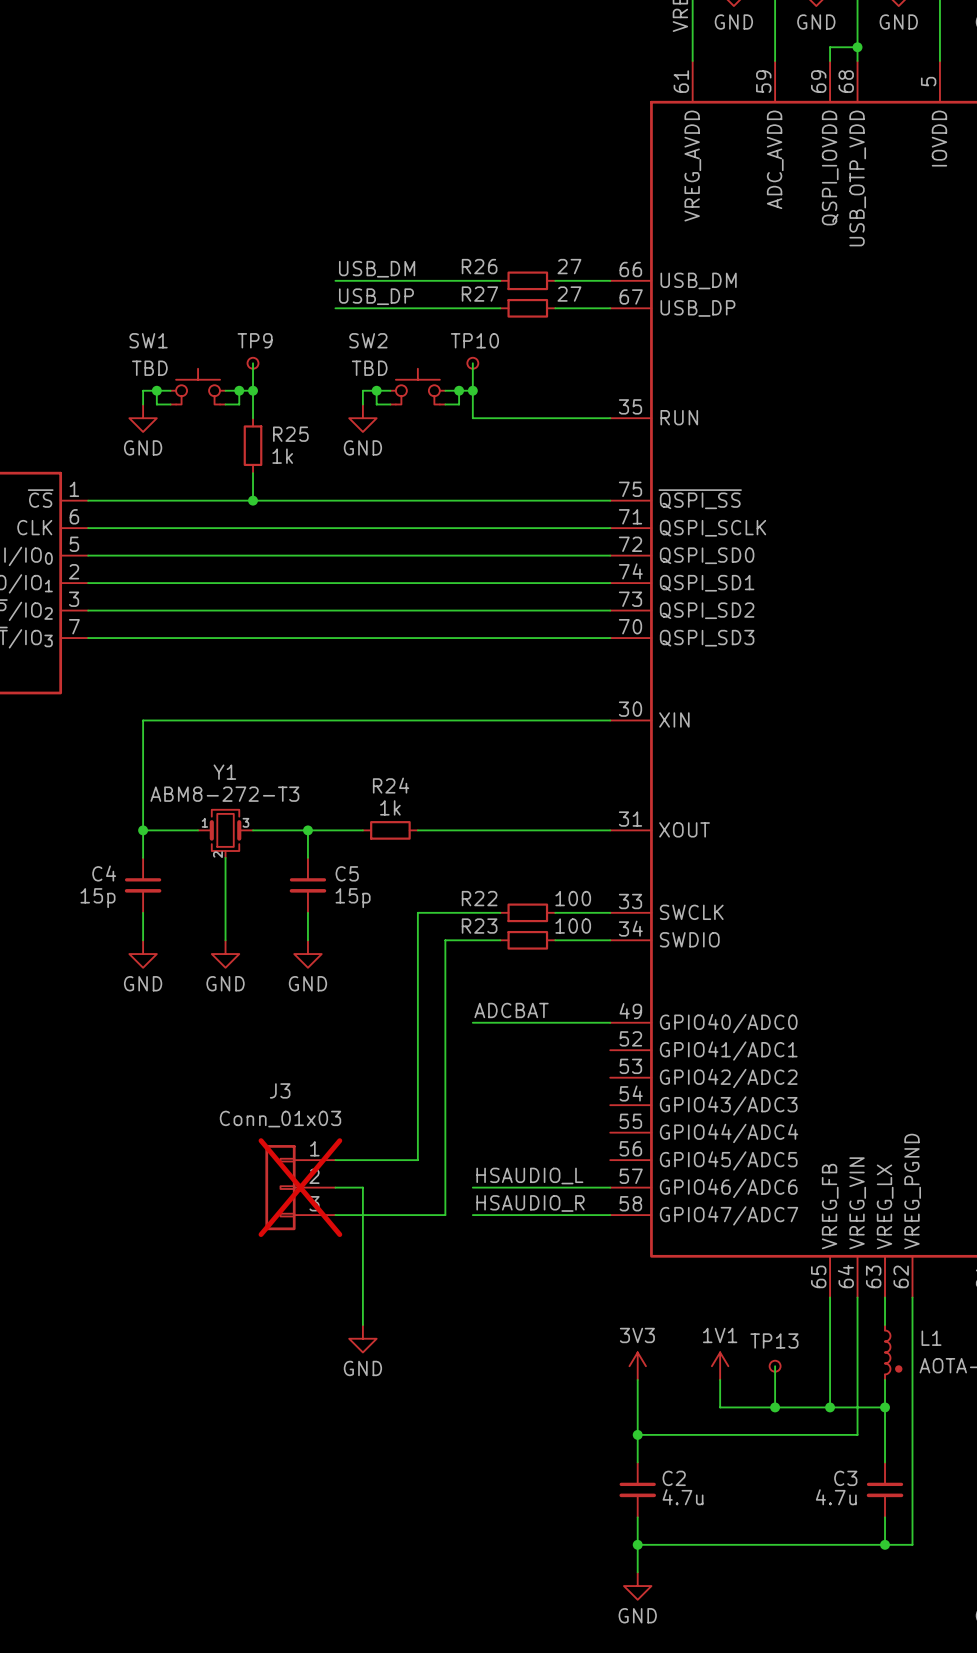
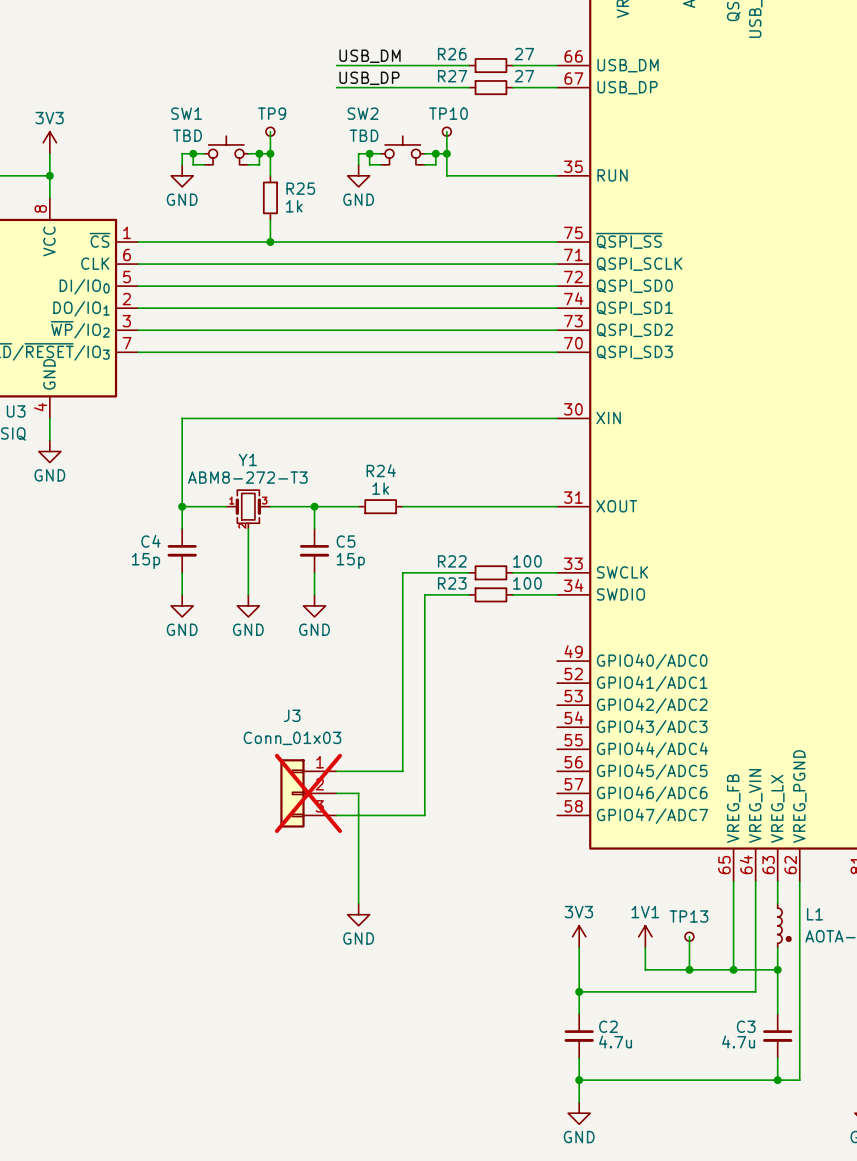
label: ADCBAT (511, 1010) -> none
wire: (472, 1022) (610, 1022) -> none
label: HSAUDIO_L (529, 1176) -> none
wire: (472, 1187) (610, 1187) -> none
label: HSAUDIO_R (530, 1203) -> none
wire: (472, 1215) (610, 1215) -> none

